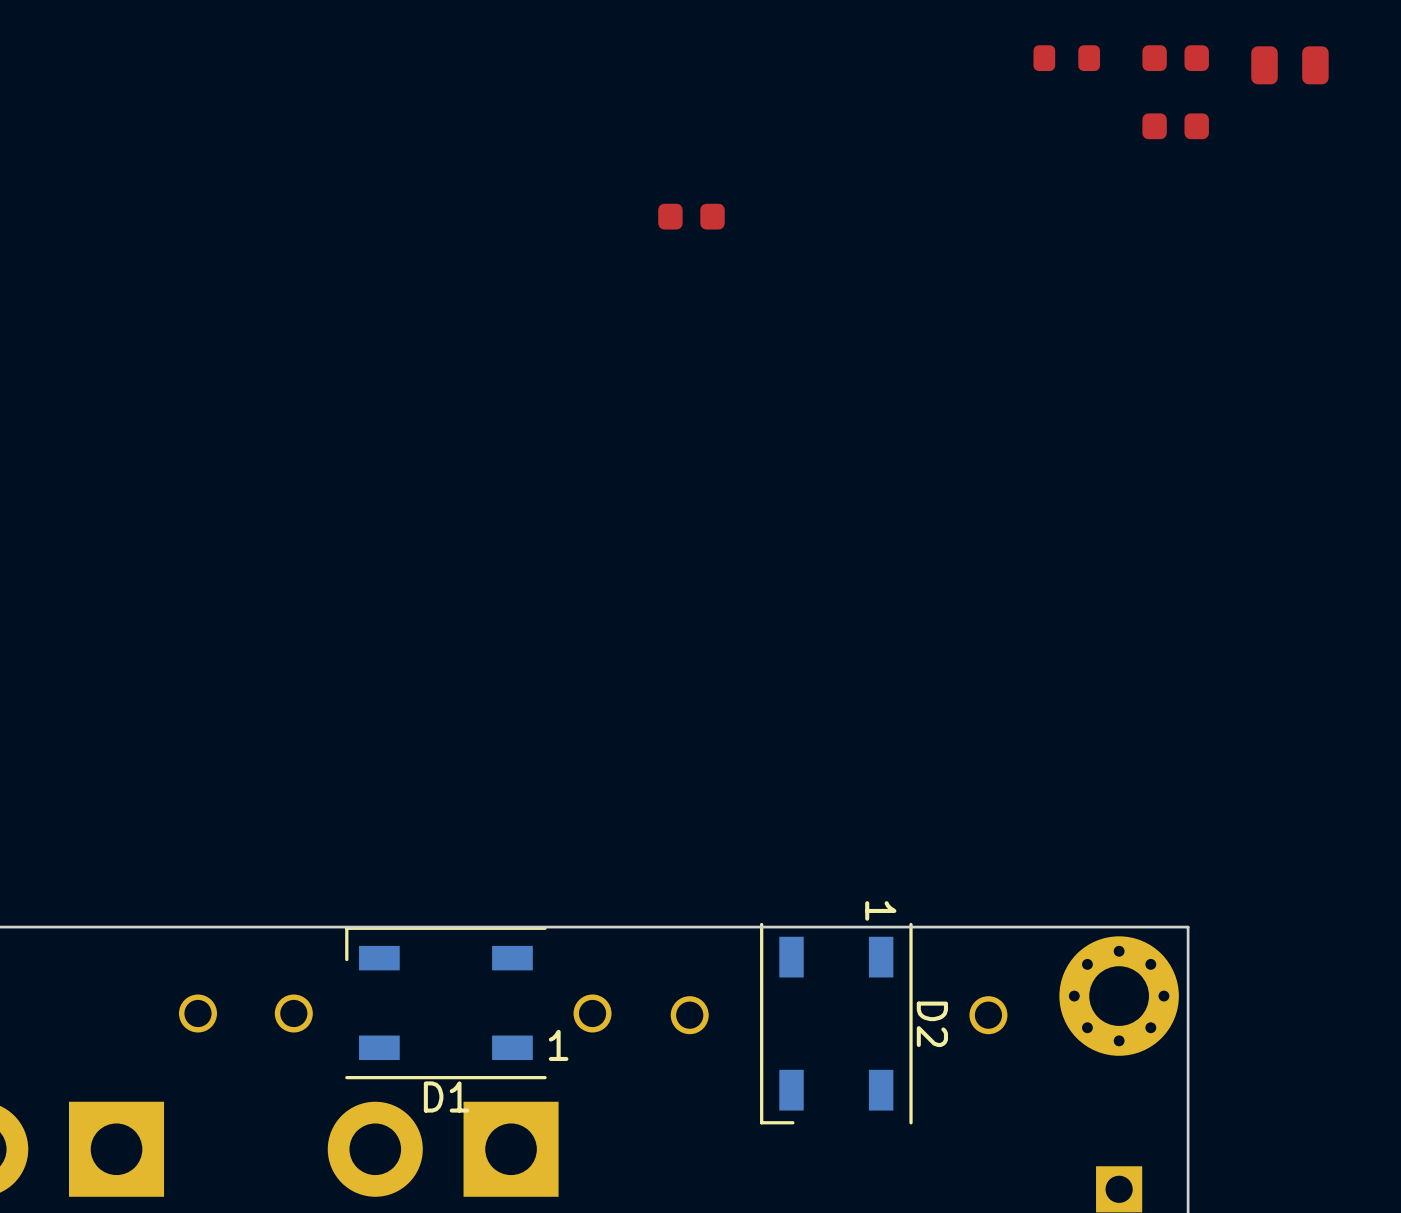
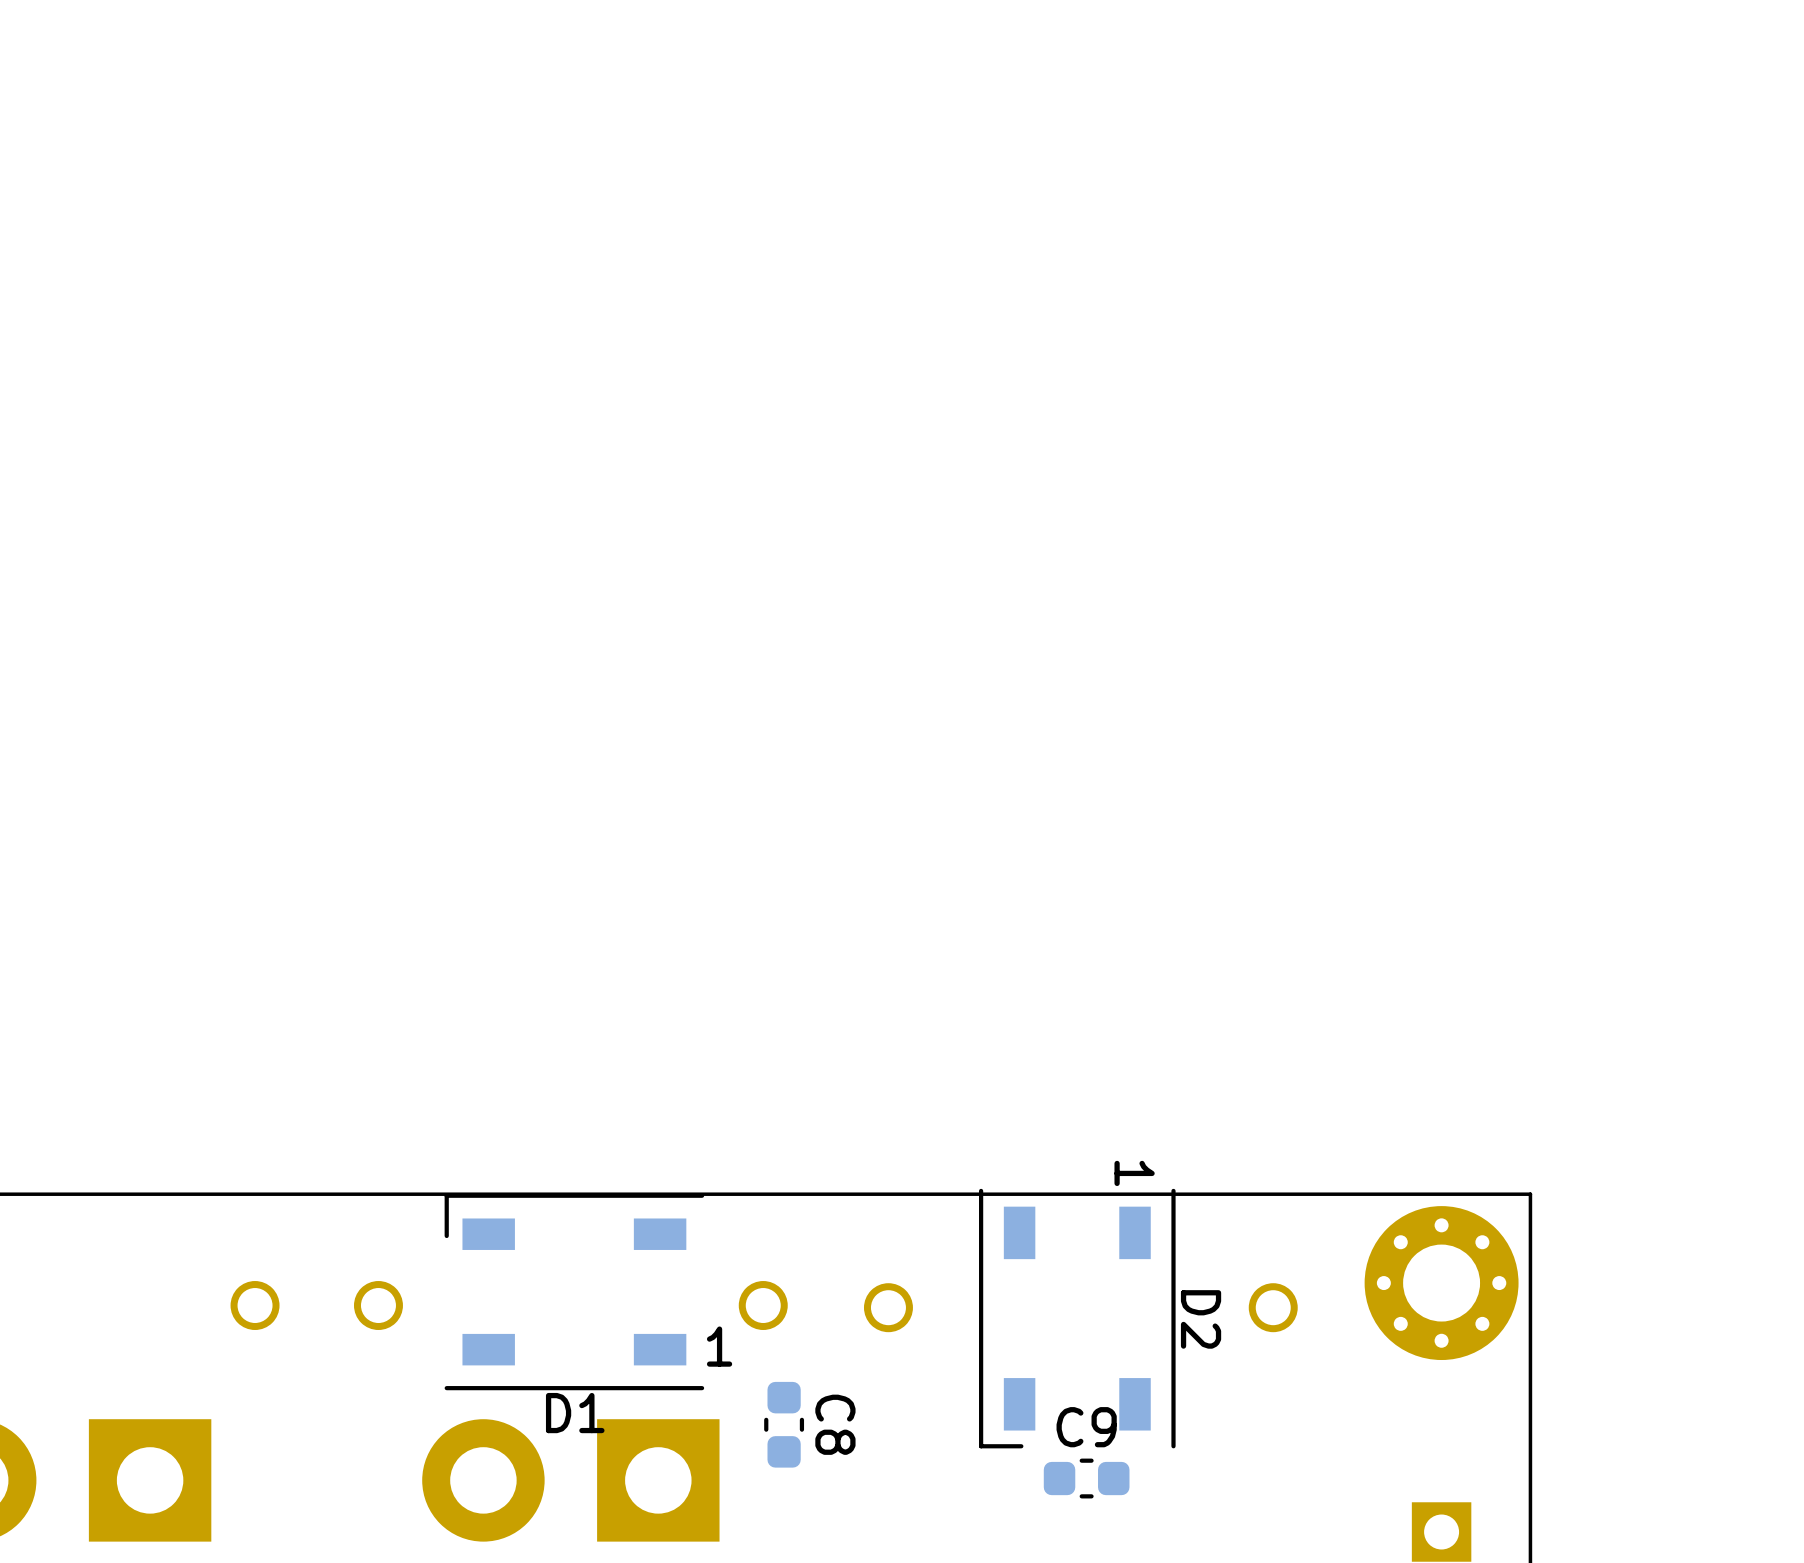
part: (1066, 58) -> none
part: (1175, 58) -> none
part: (1289, 65) -> none
part: (1175, 126) -> none
part: (691, 216) -> none
C8: none -> (784, 1424)
C9: none -> (1086, 1478)

